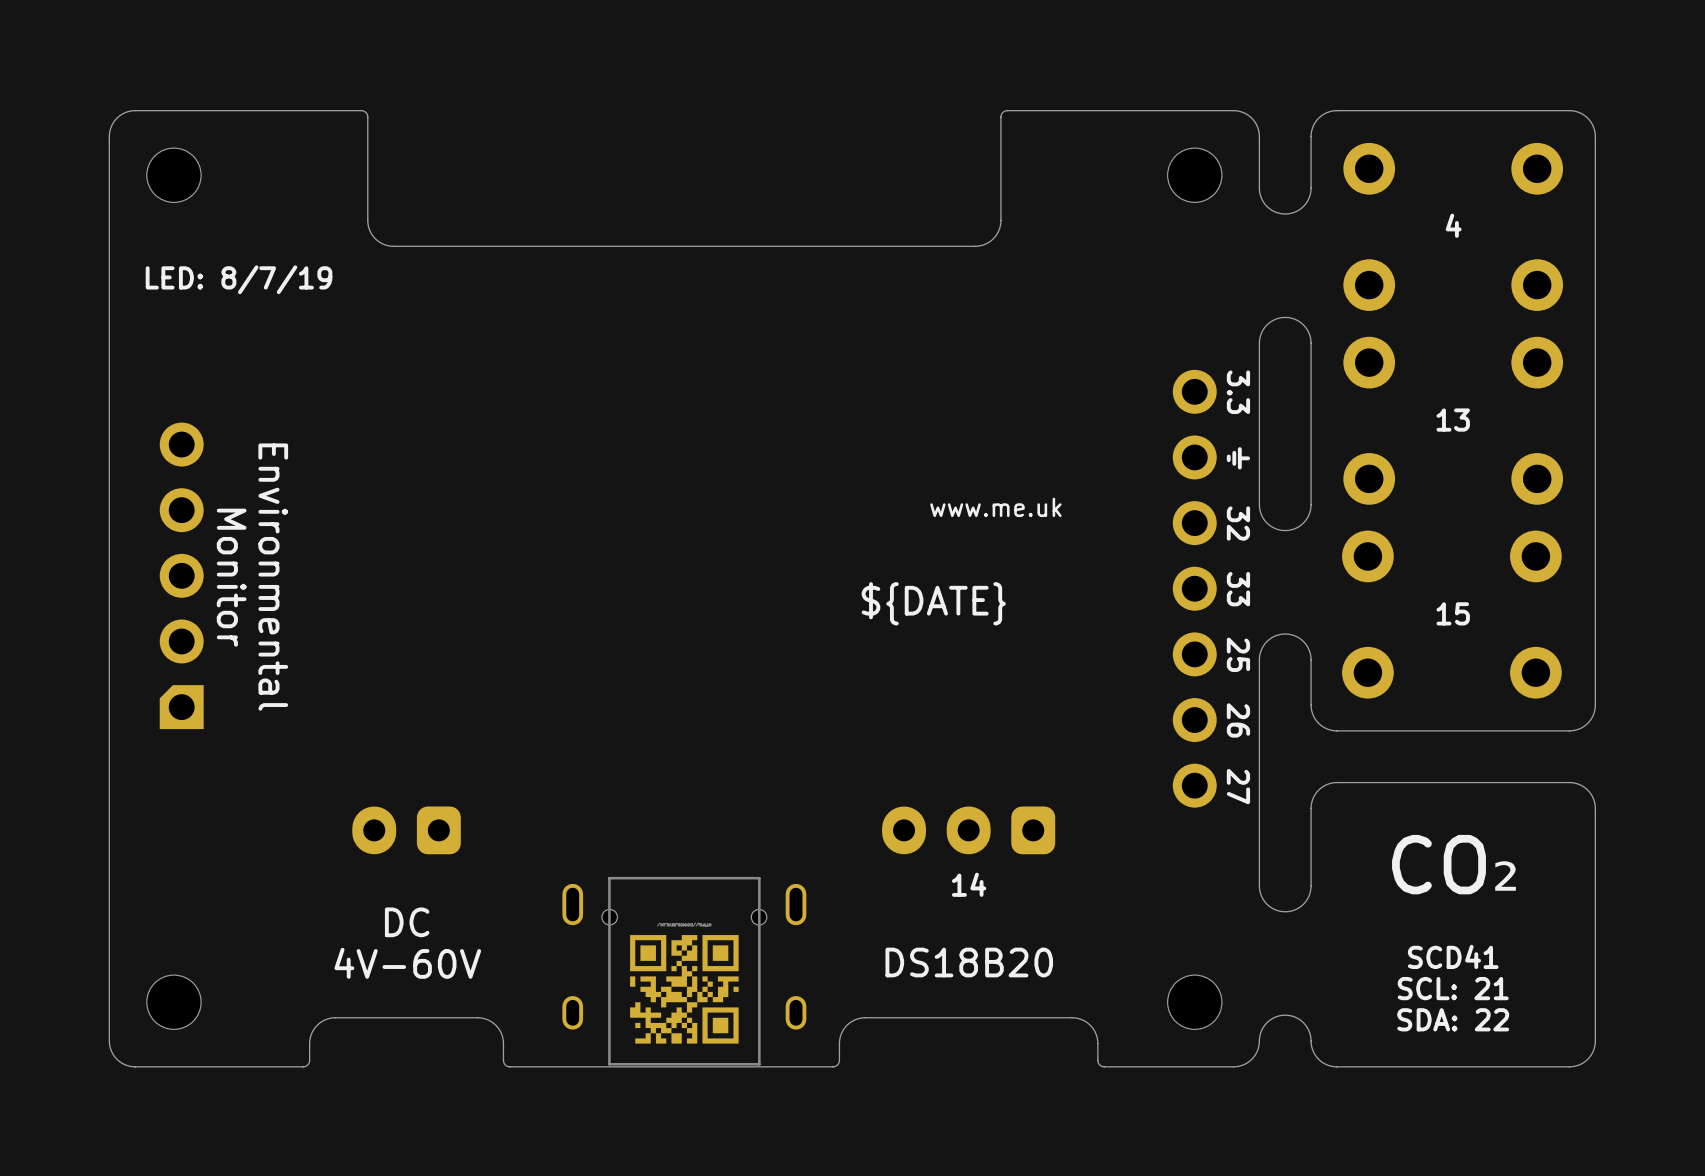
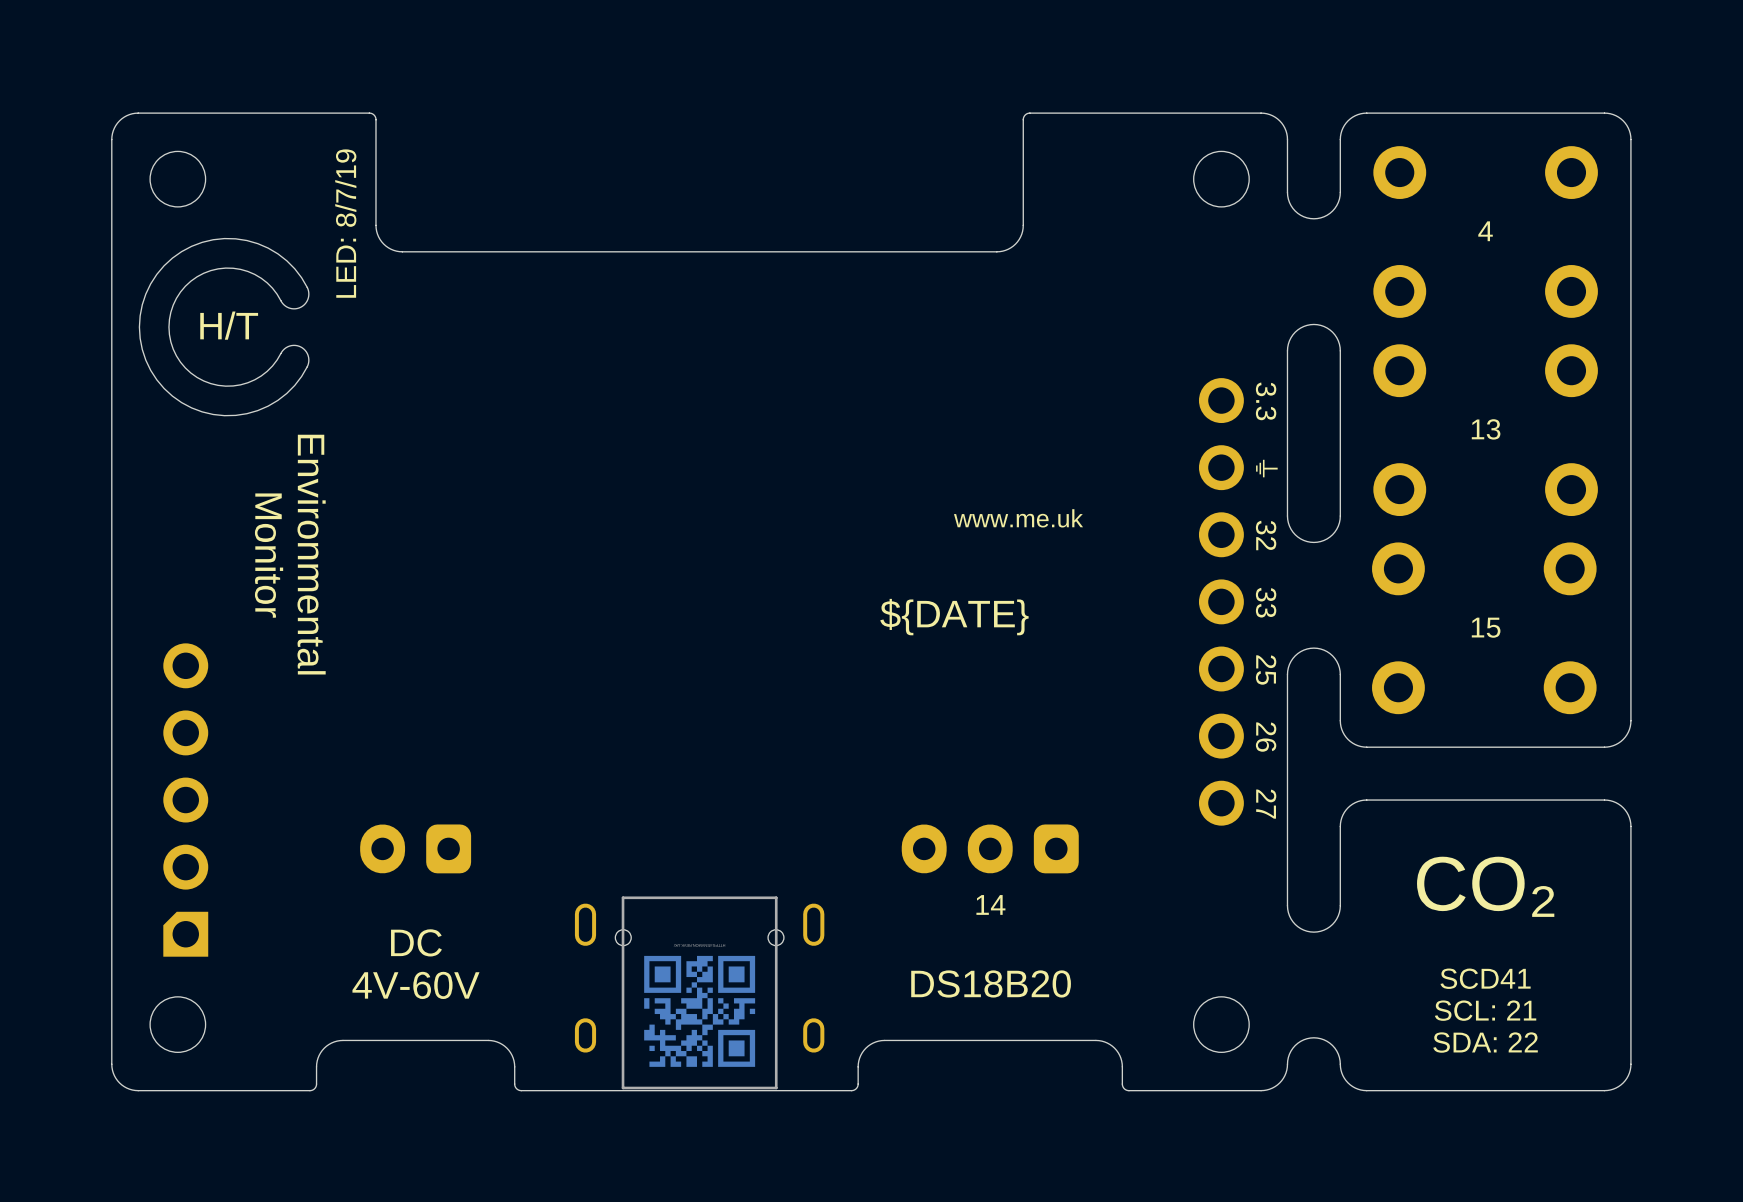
text rotation: 0° (239, 279) -> 90° counterclockwise (345, 223)
board edge: none -> (307, 287) (308, 294) (306, 302) (299, 308) (290, 308) (282, 303) (267, 282) (254, 274) (240, 269) (218, 268) (203, 273) (190, 281) (180, 291) (173, 305) (168, 327) (173, 349) (185, 368) (197, 377) (210, 383) (233, 385) (247, 382) (267, 371) (287, 346) (297, 345) (305, 350) (308, 363) (301, 376) (286, 393) (268, 406) (235, 415) (202, 411) (172, 396) (150, 370) (140, 338) (142, 304) (156, 274) (181, 251) (213, 239) (235, 238) (257, 243) (286, 260) (307, 287)
text: none -> H/T (229, 325)
part position: (181, 575) -> (185, 800)
text position: Monitor (231, 577) -> Monitor (269, 555)
text position: Environmental (273, 577) -> Environmental (311, 554)

